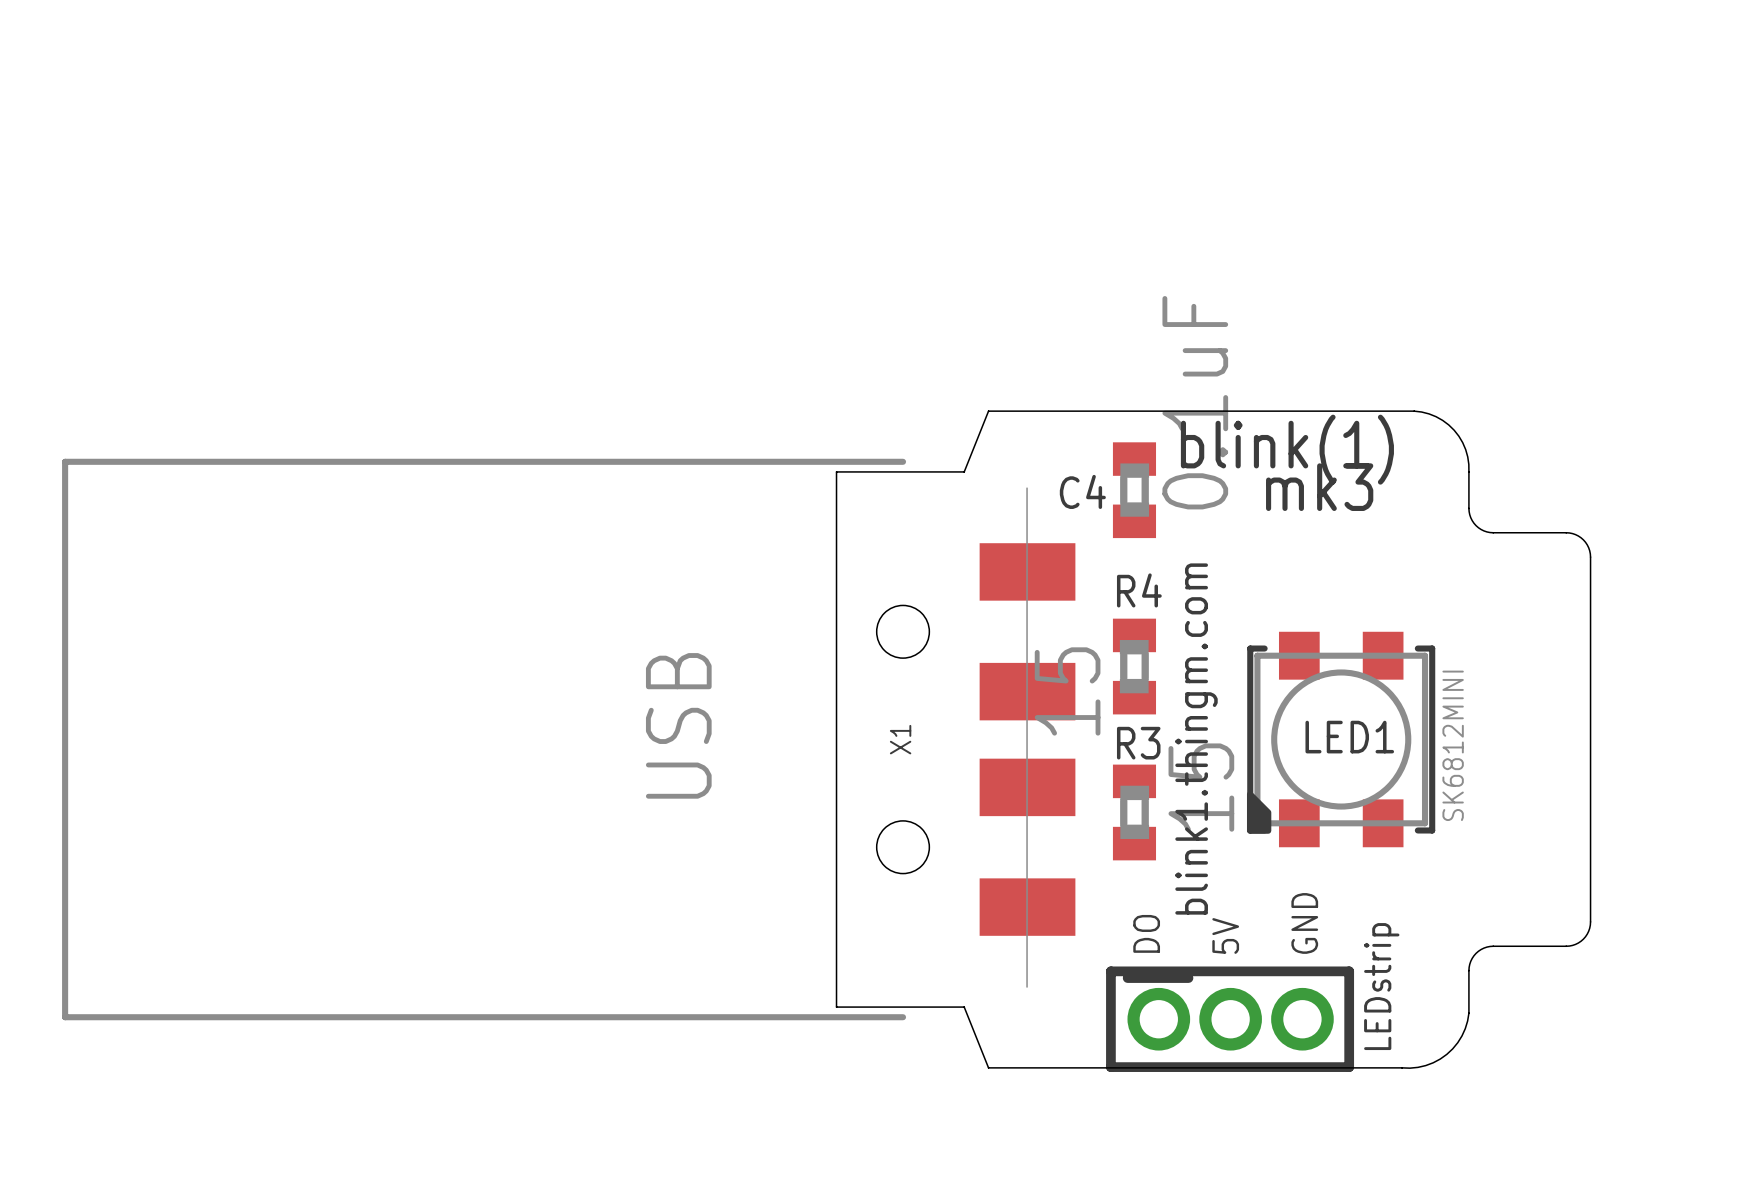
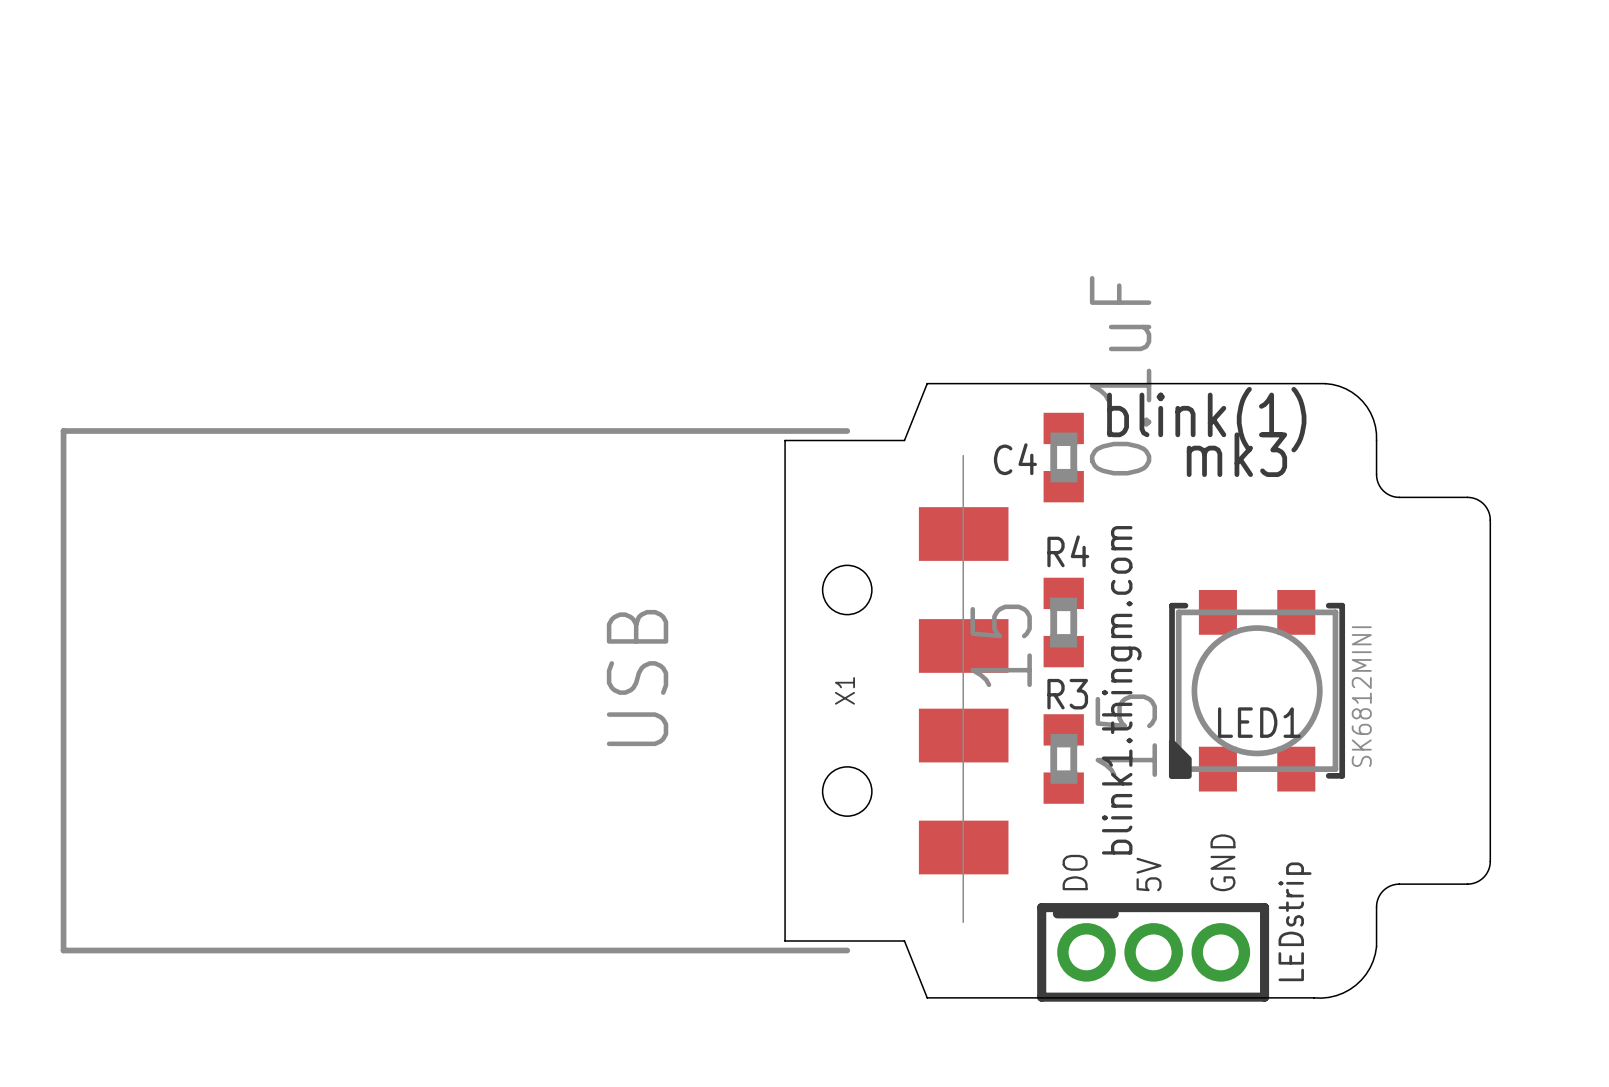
LED1 name position: LED1 (1349, 737) -> LED1 (1259, 722)

